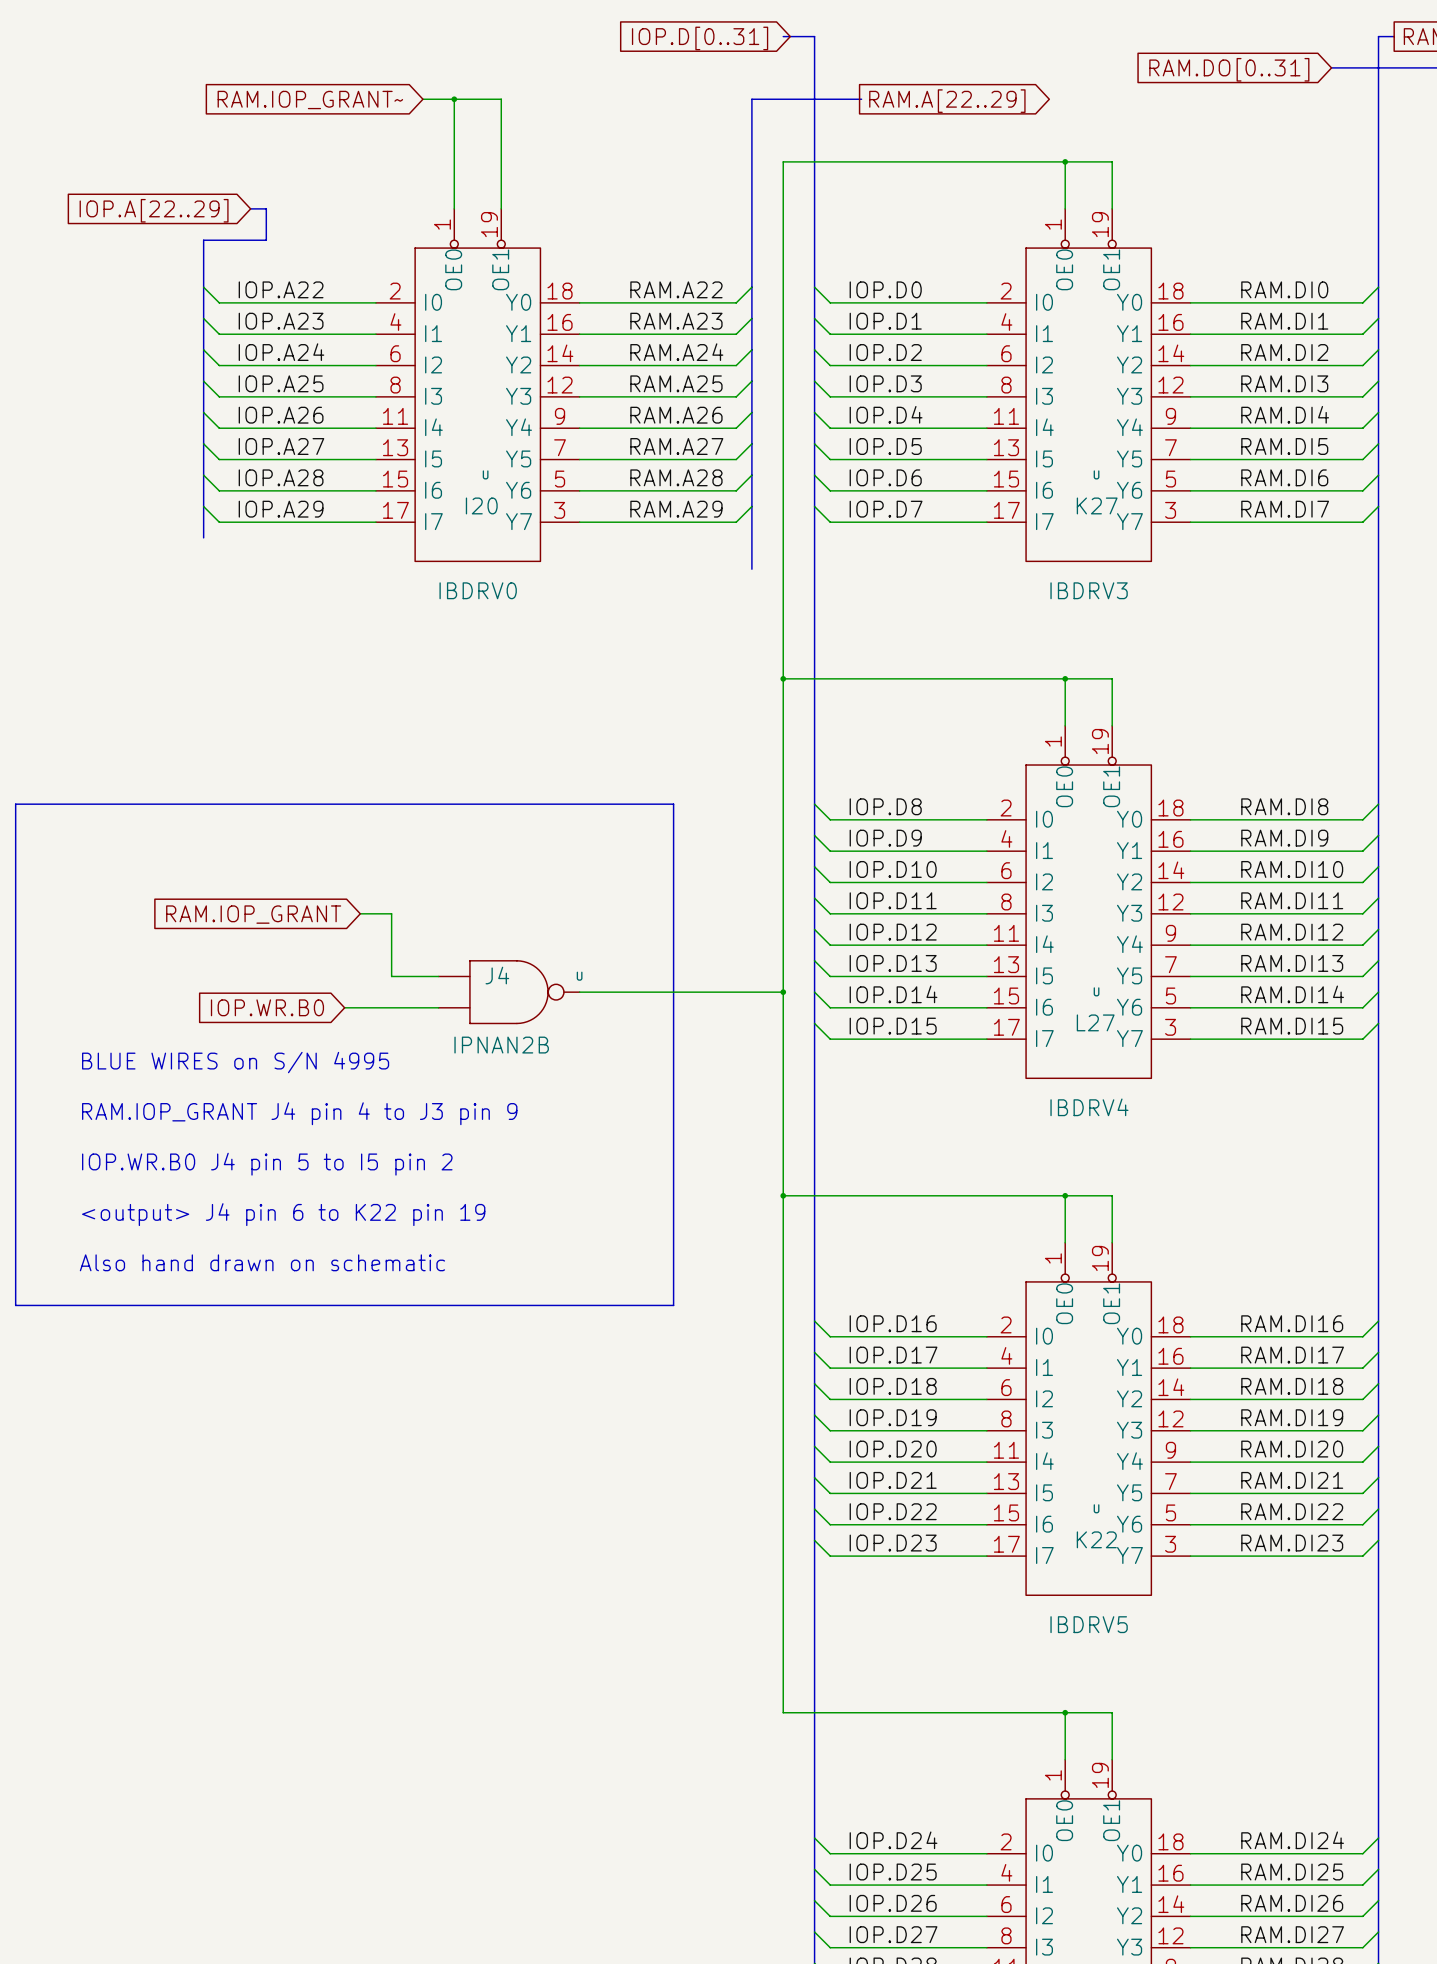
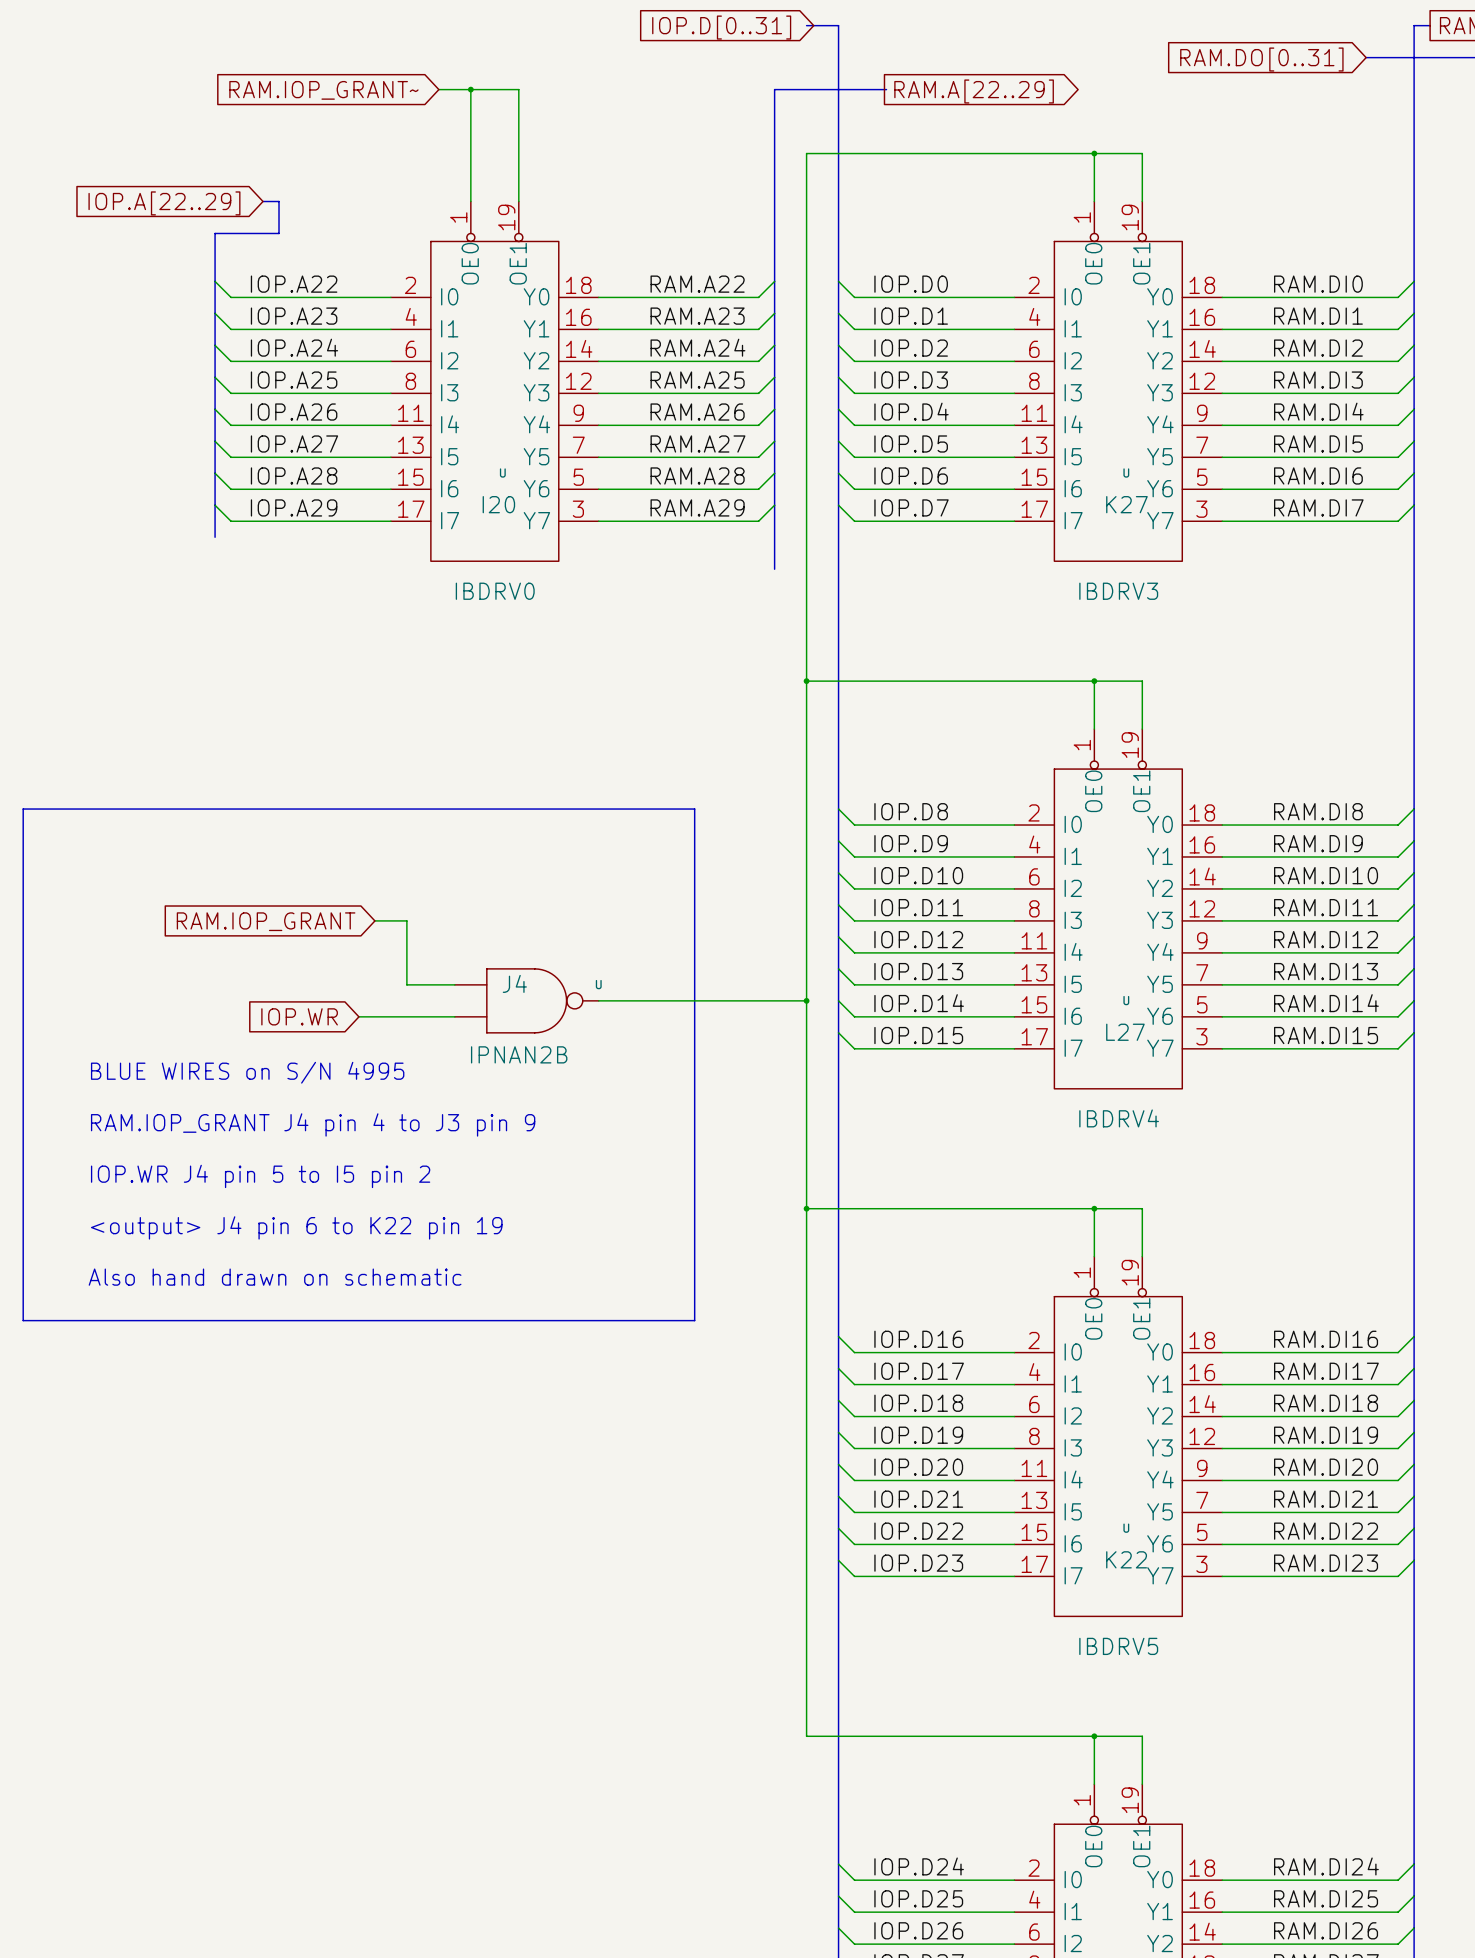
global label: IOP.WR.B0 (267, 1007) -> IOP.WR (299, 1016)
text: IOP.WR.B0 J4 pin 5 to I5 pin 2 (267, 1164) -> IOP.WR J4 pin 5 to I5 pin 2 (260, 1176)

